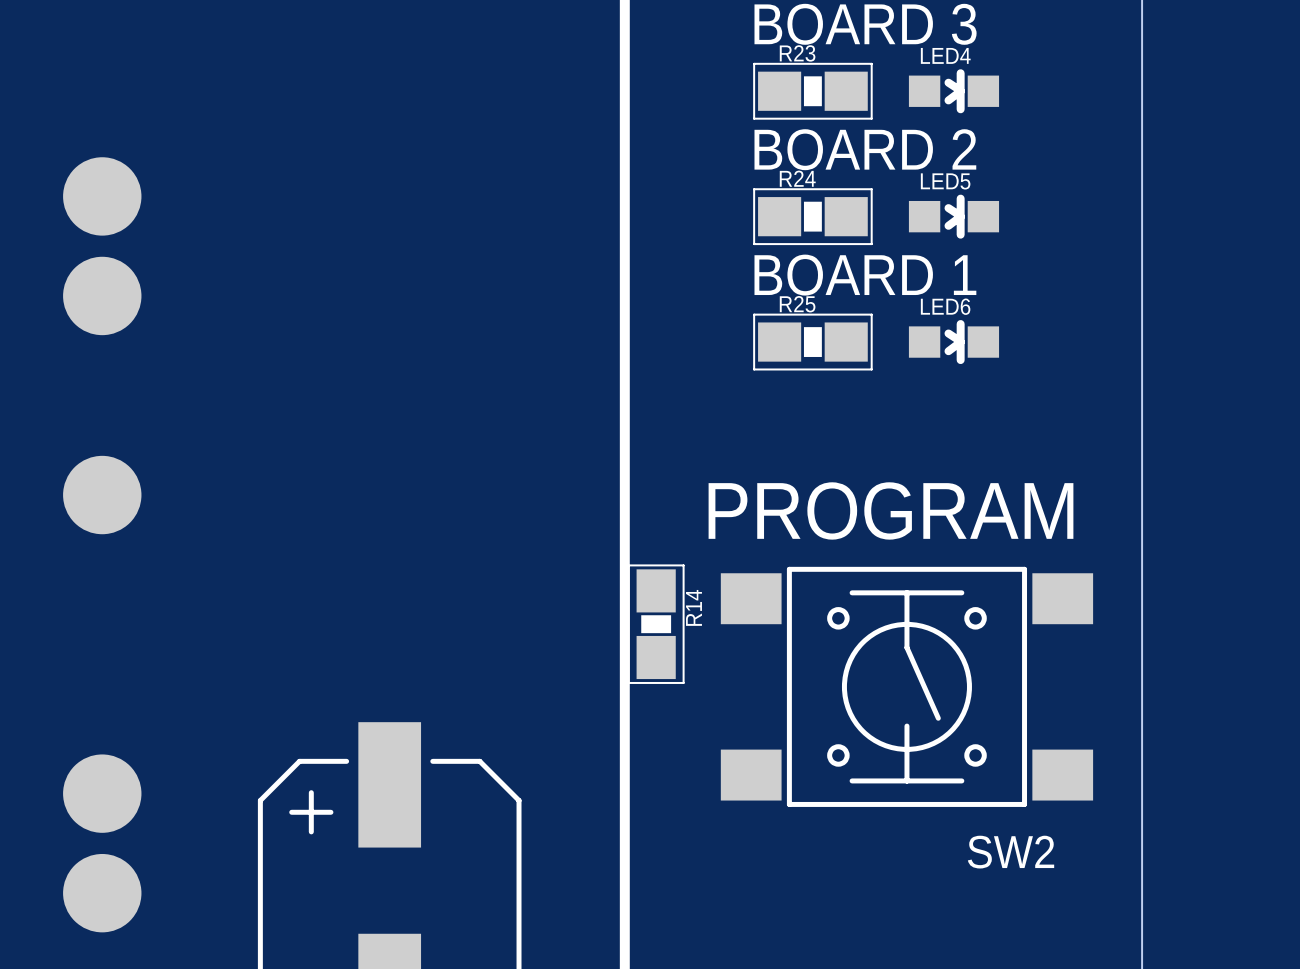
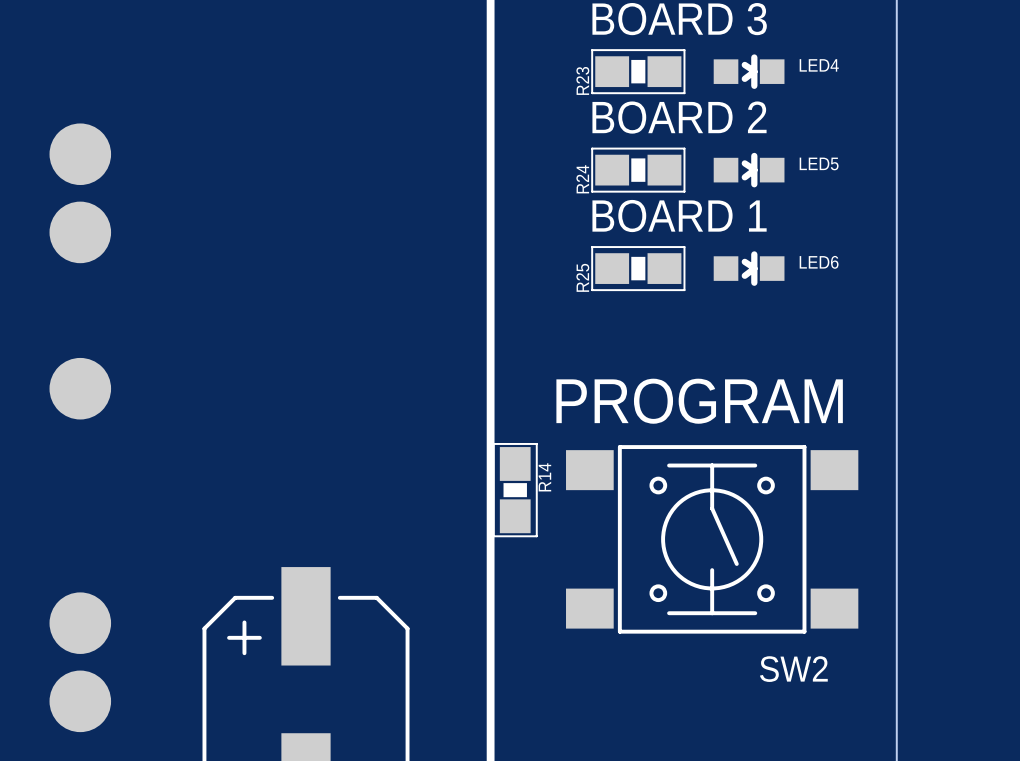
R23 name rotation: 0° (797, 53) -> 90° counterclockwise (582, 80)
R23 name position: R23 (797, 53) -> R23 (582, 80)
LED4 name position: LED4 (945, 55) -> LED4 (819, 65)
R24 name rotation: 0° (797, 178) -> 90° counterclockwise (582, 179)
R24 name position: R24 (797, 178) -> R24 (582, 179)
LED5 name position: LED5 (945, 181) -> LED5 (819, 163)
R25 name rotation: 0° (797, 304) -> 90° counterclockwise (582, 277)
R25 name position: R25 (797, 304) -> R25 (582, 277)
LED6 name position: LED6 (945, 306) -> LED6 (819, 262)

